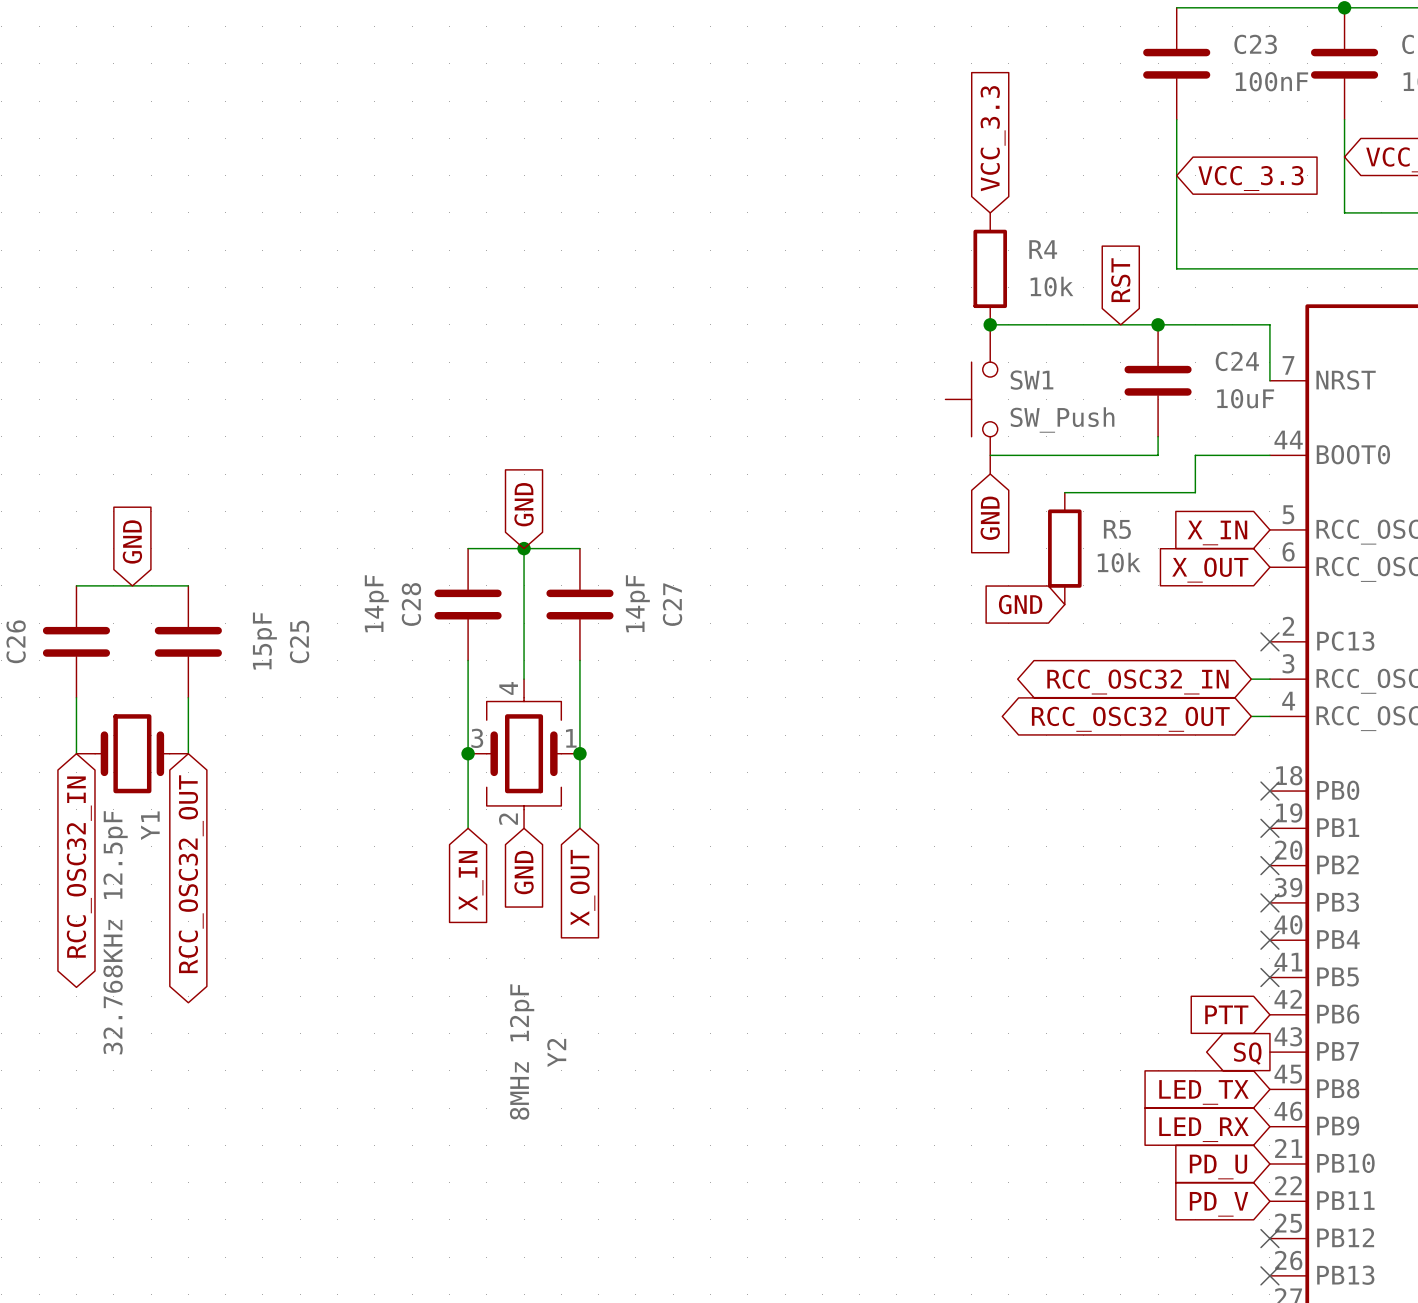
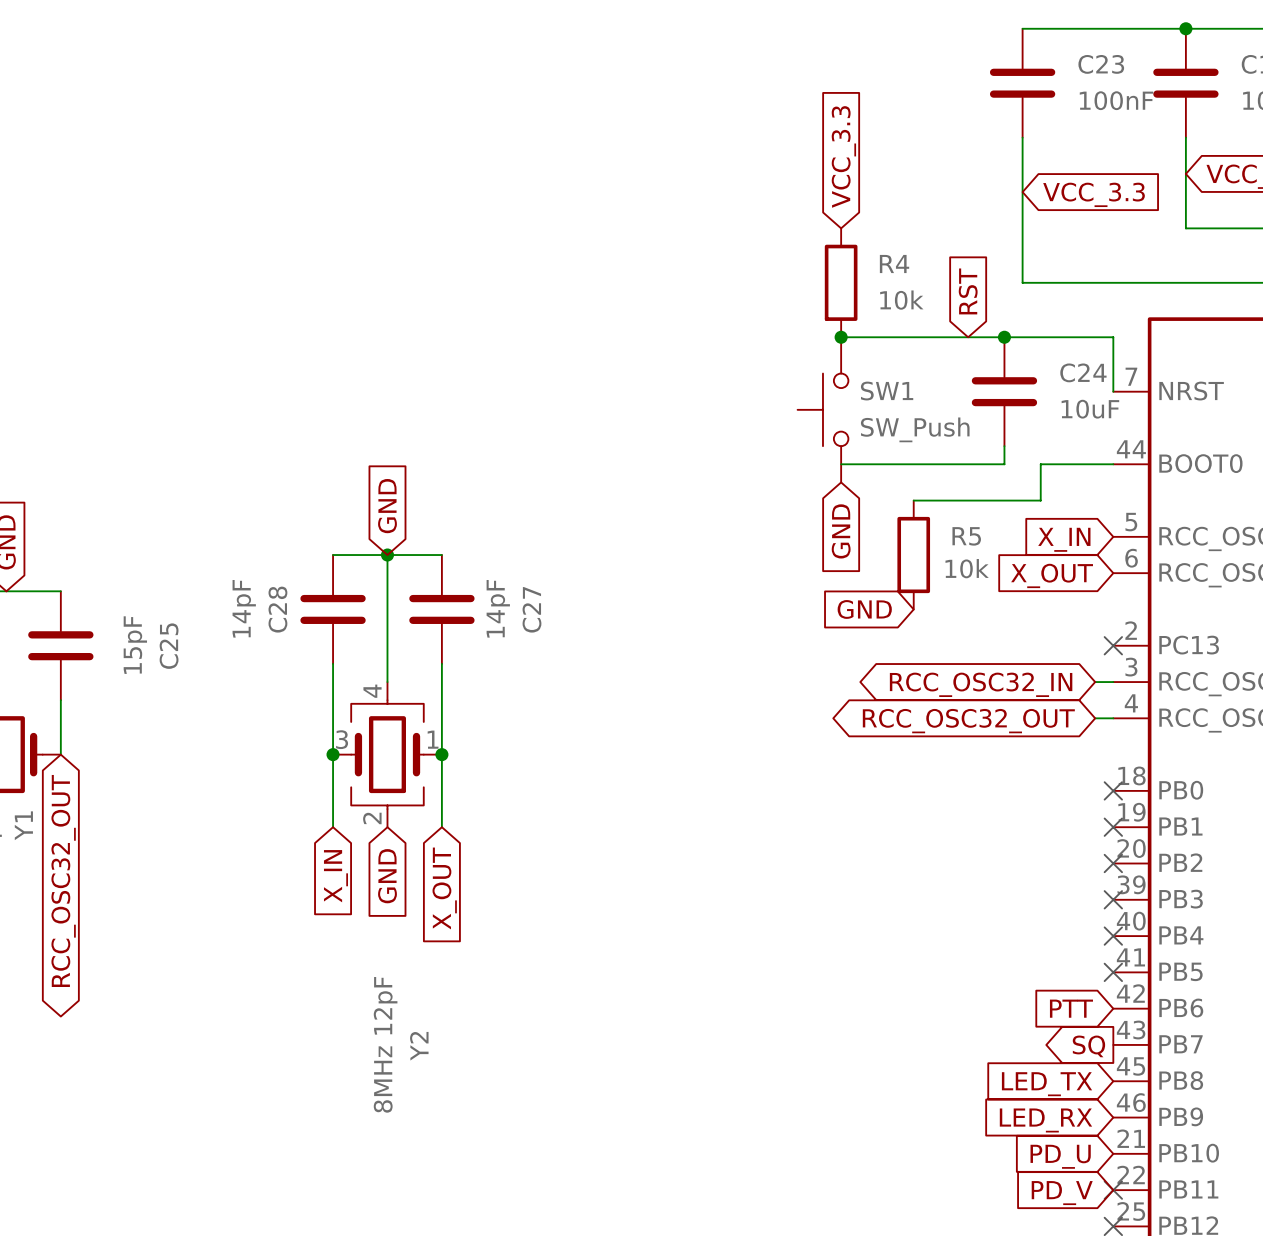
no-connect mark: none -> (1113, 1190)

